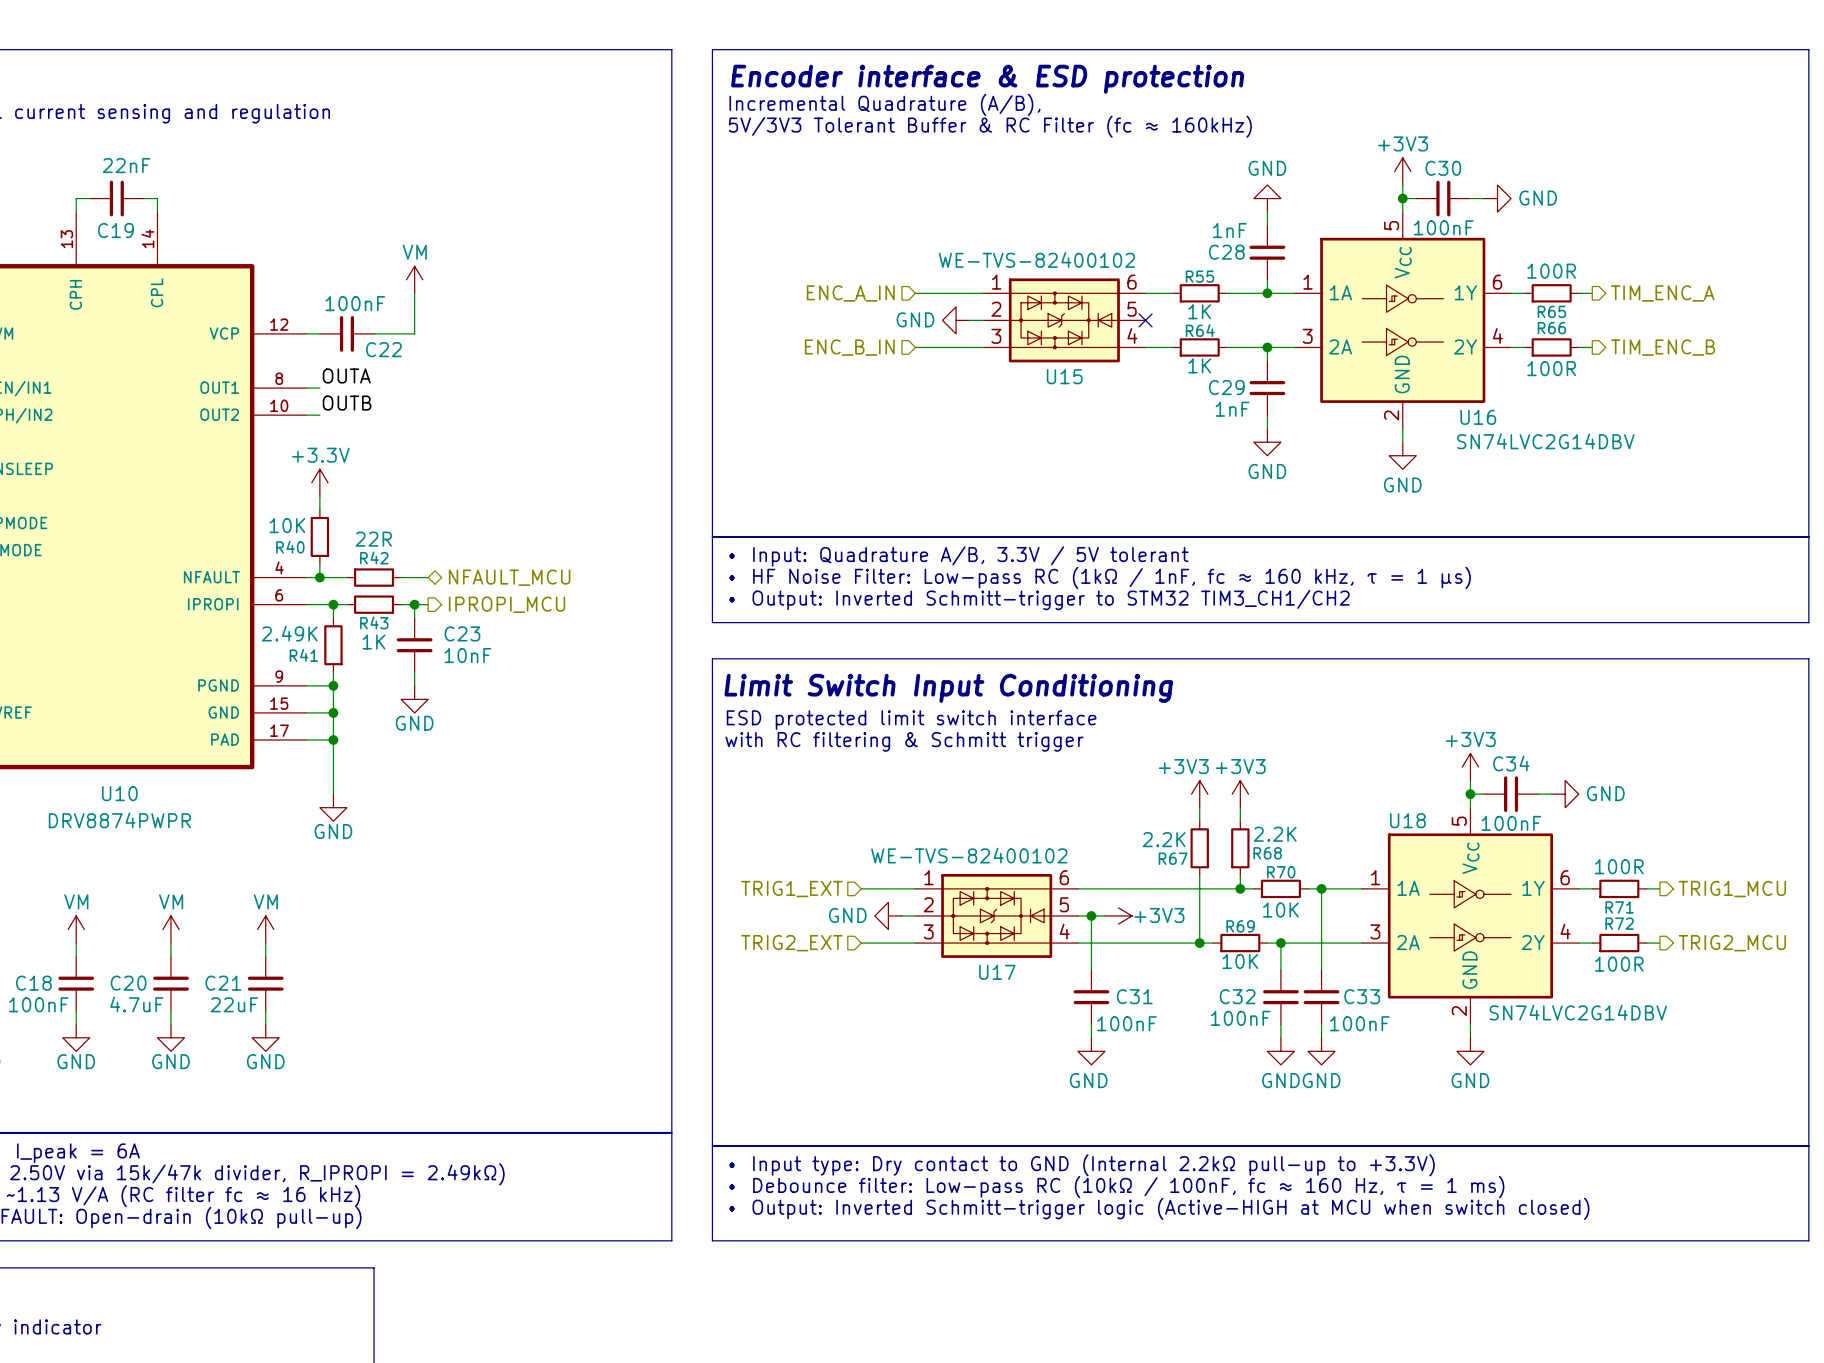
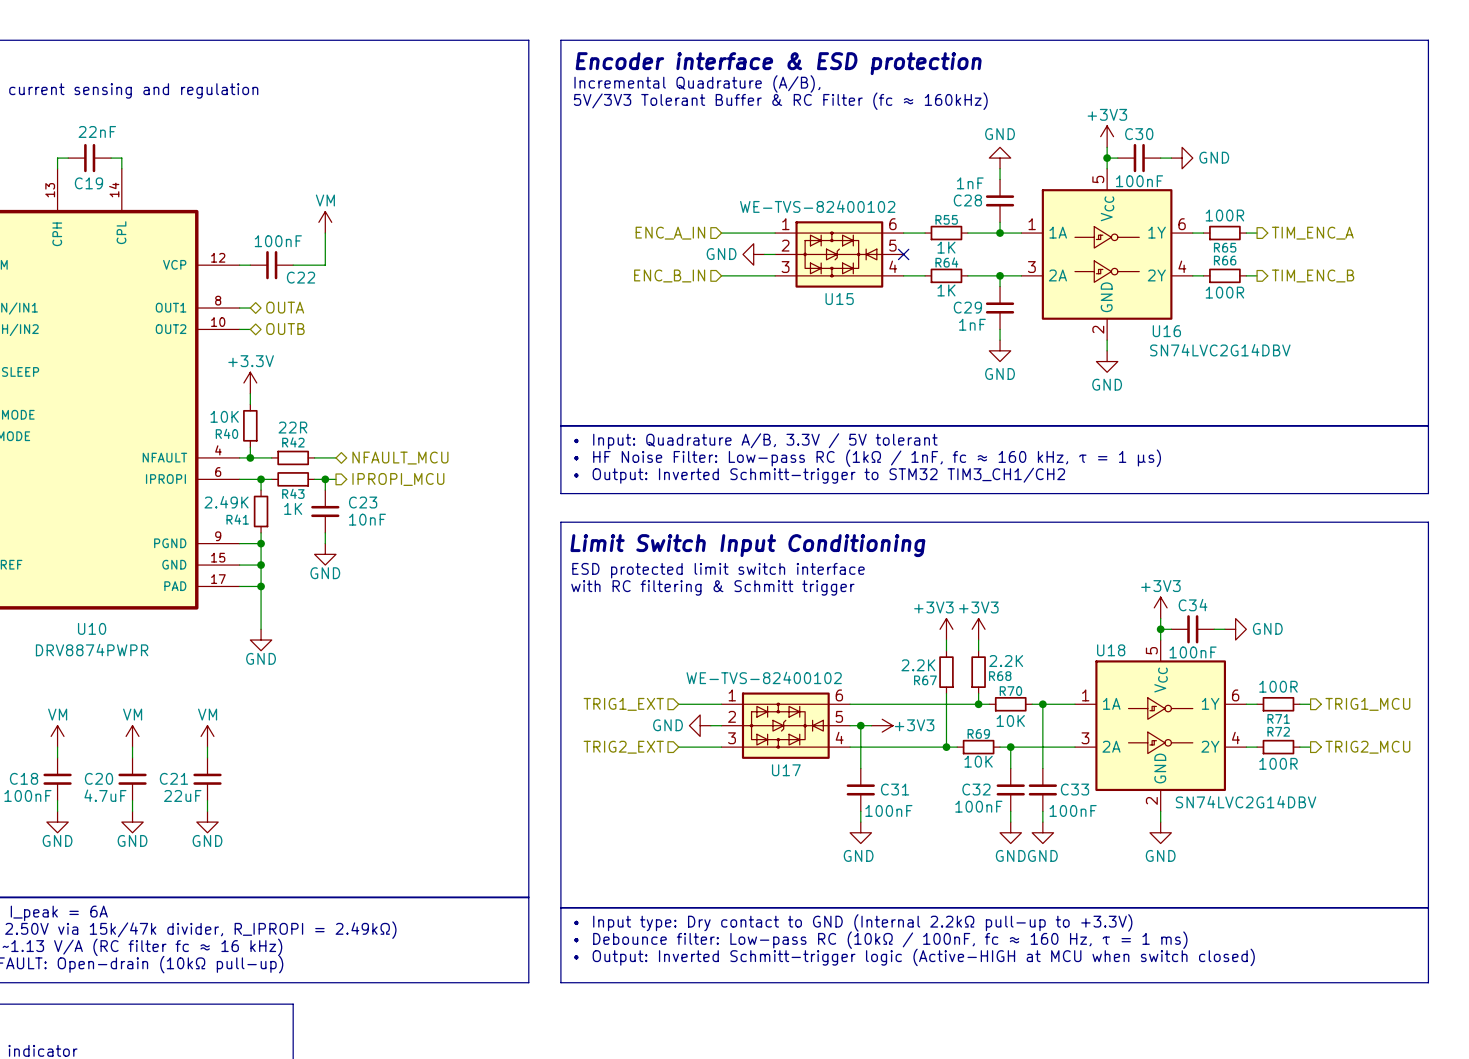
label: OUTA (346, 375) -> none
hierarchical label: none -> OUTA (285, 307)
label: OUTB (347, 403) -> none
hierarchical label: none -> OUTB (285, 329)

